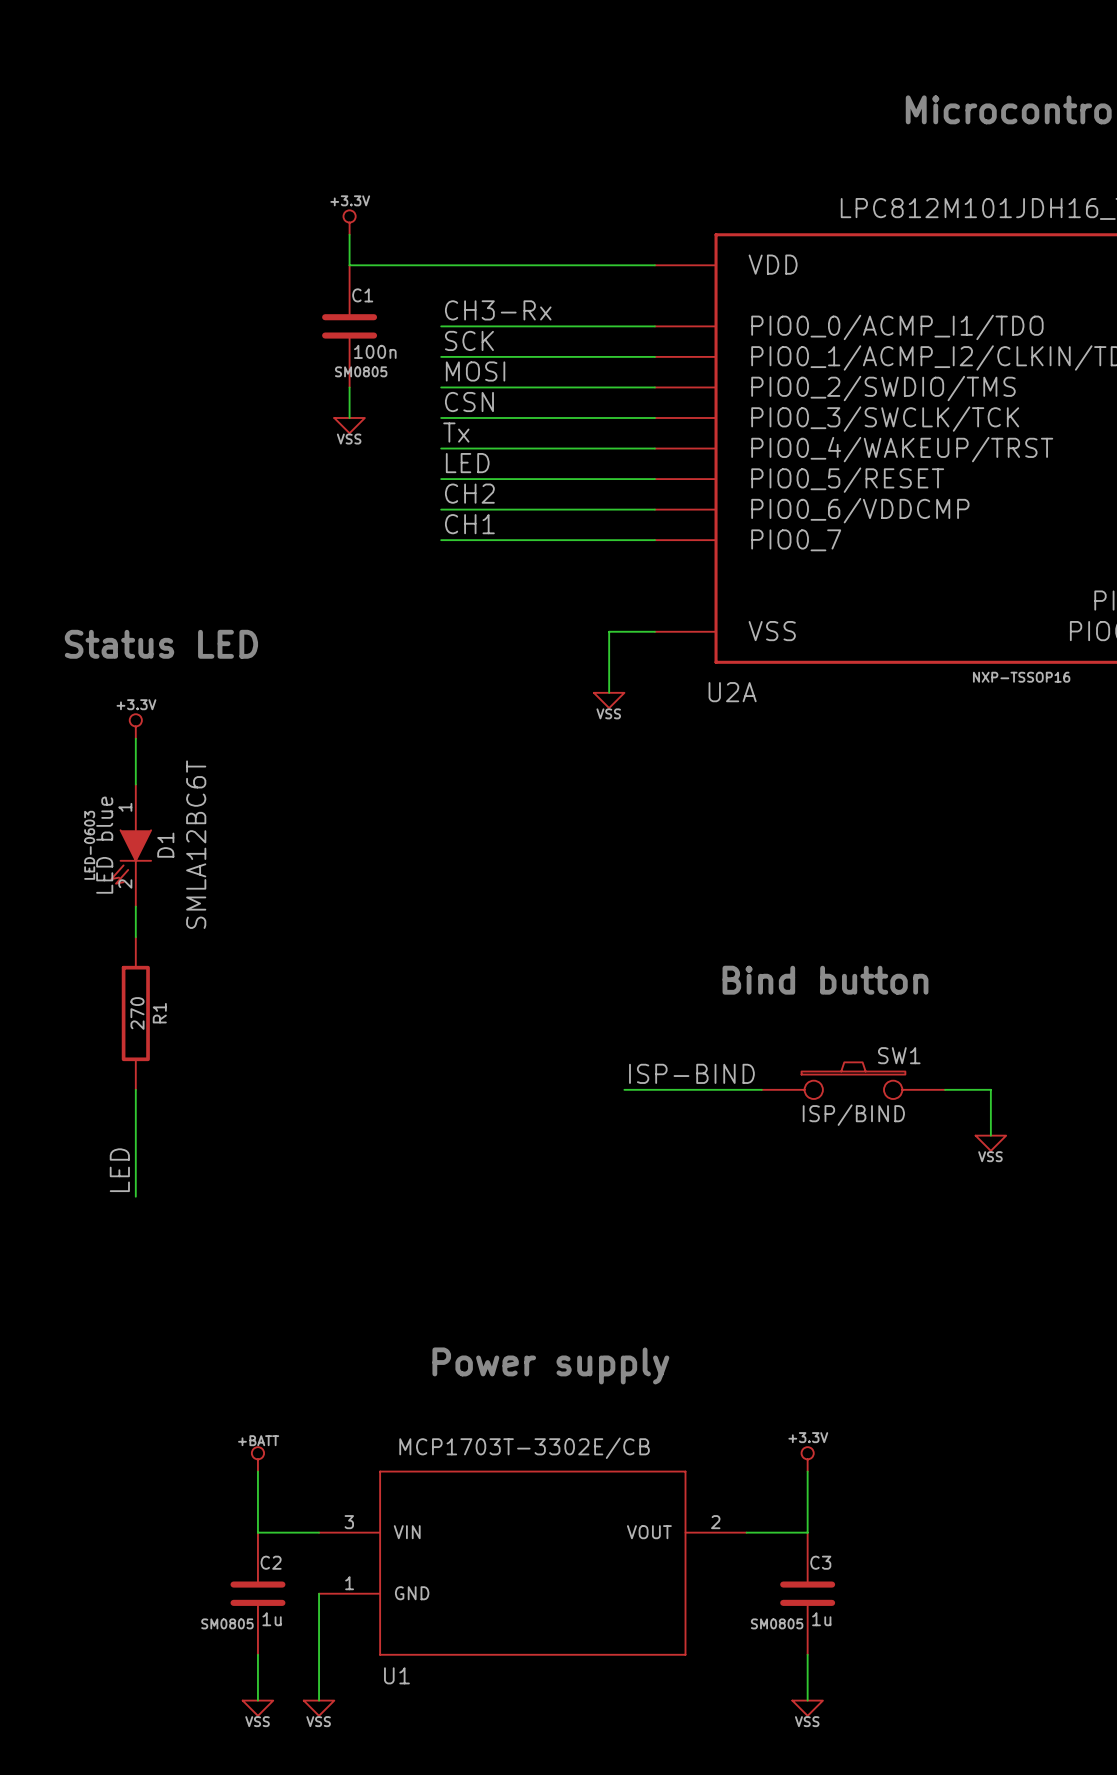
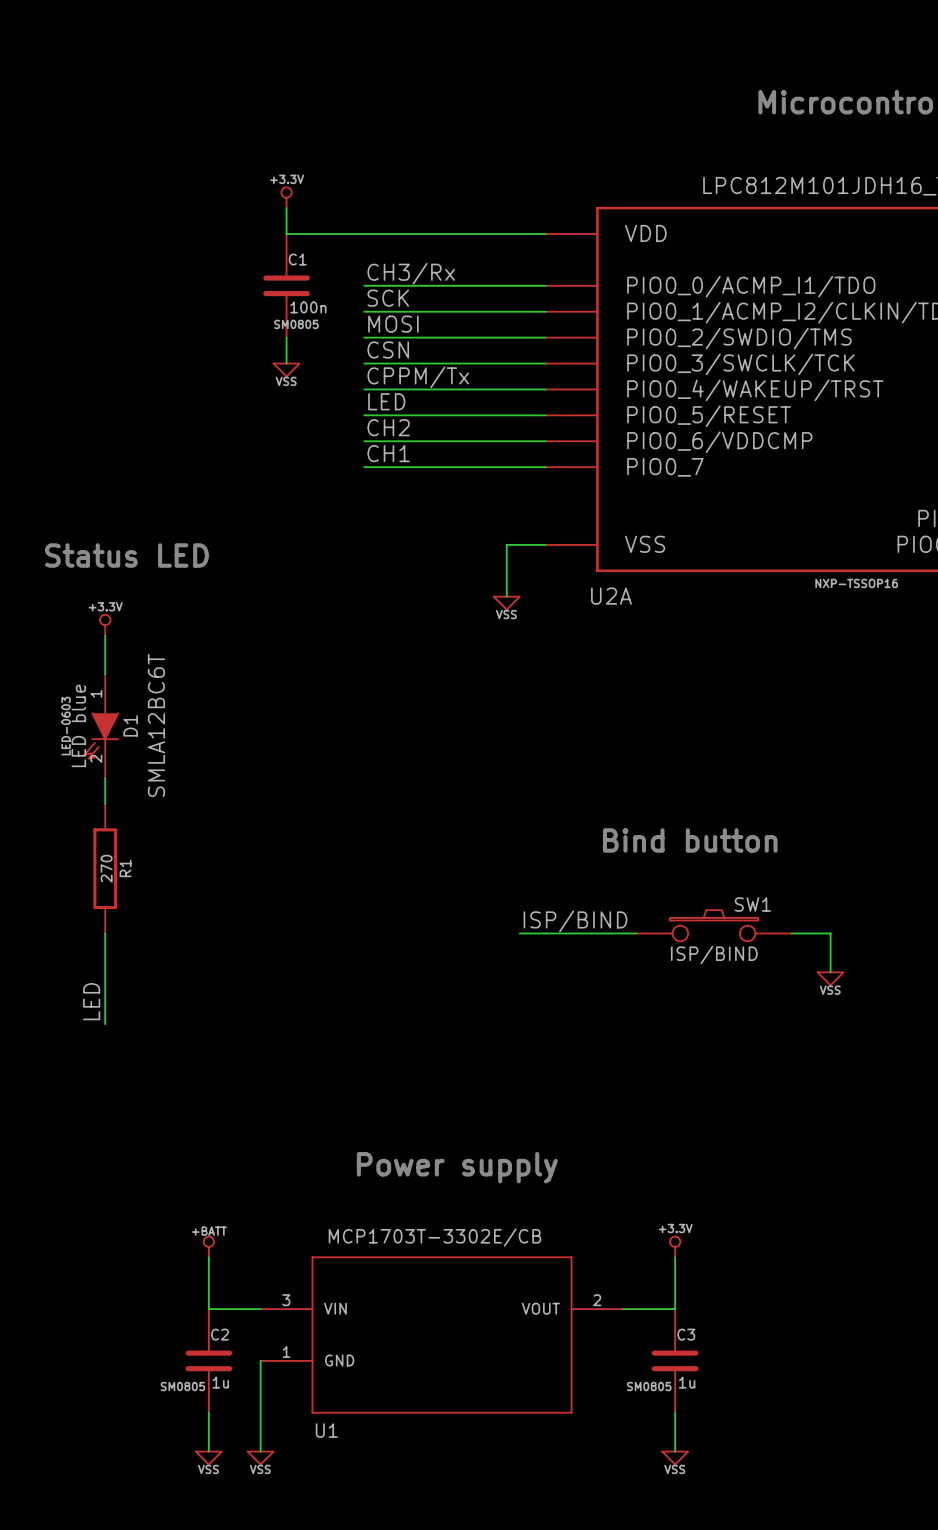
label: CH3-Rx (498, 310) -> CH3/Rx (411, 273)
label: Tx (456, 432) -> CPPM/Tx (418, 377)
label: ISP-BIND (691, 1073) -> ISP/BIND (575, 921)

